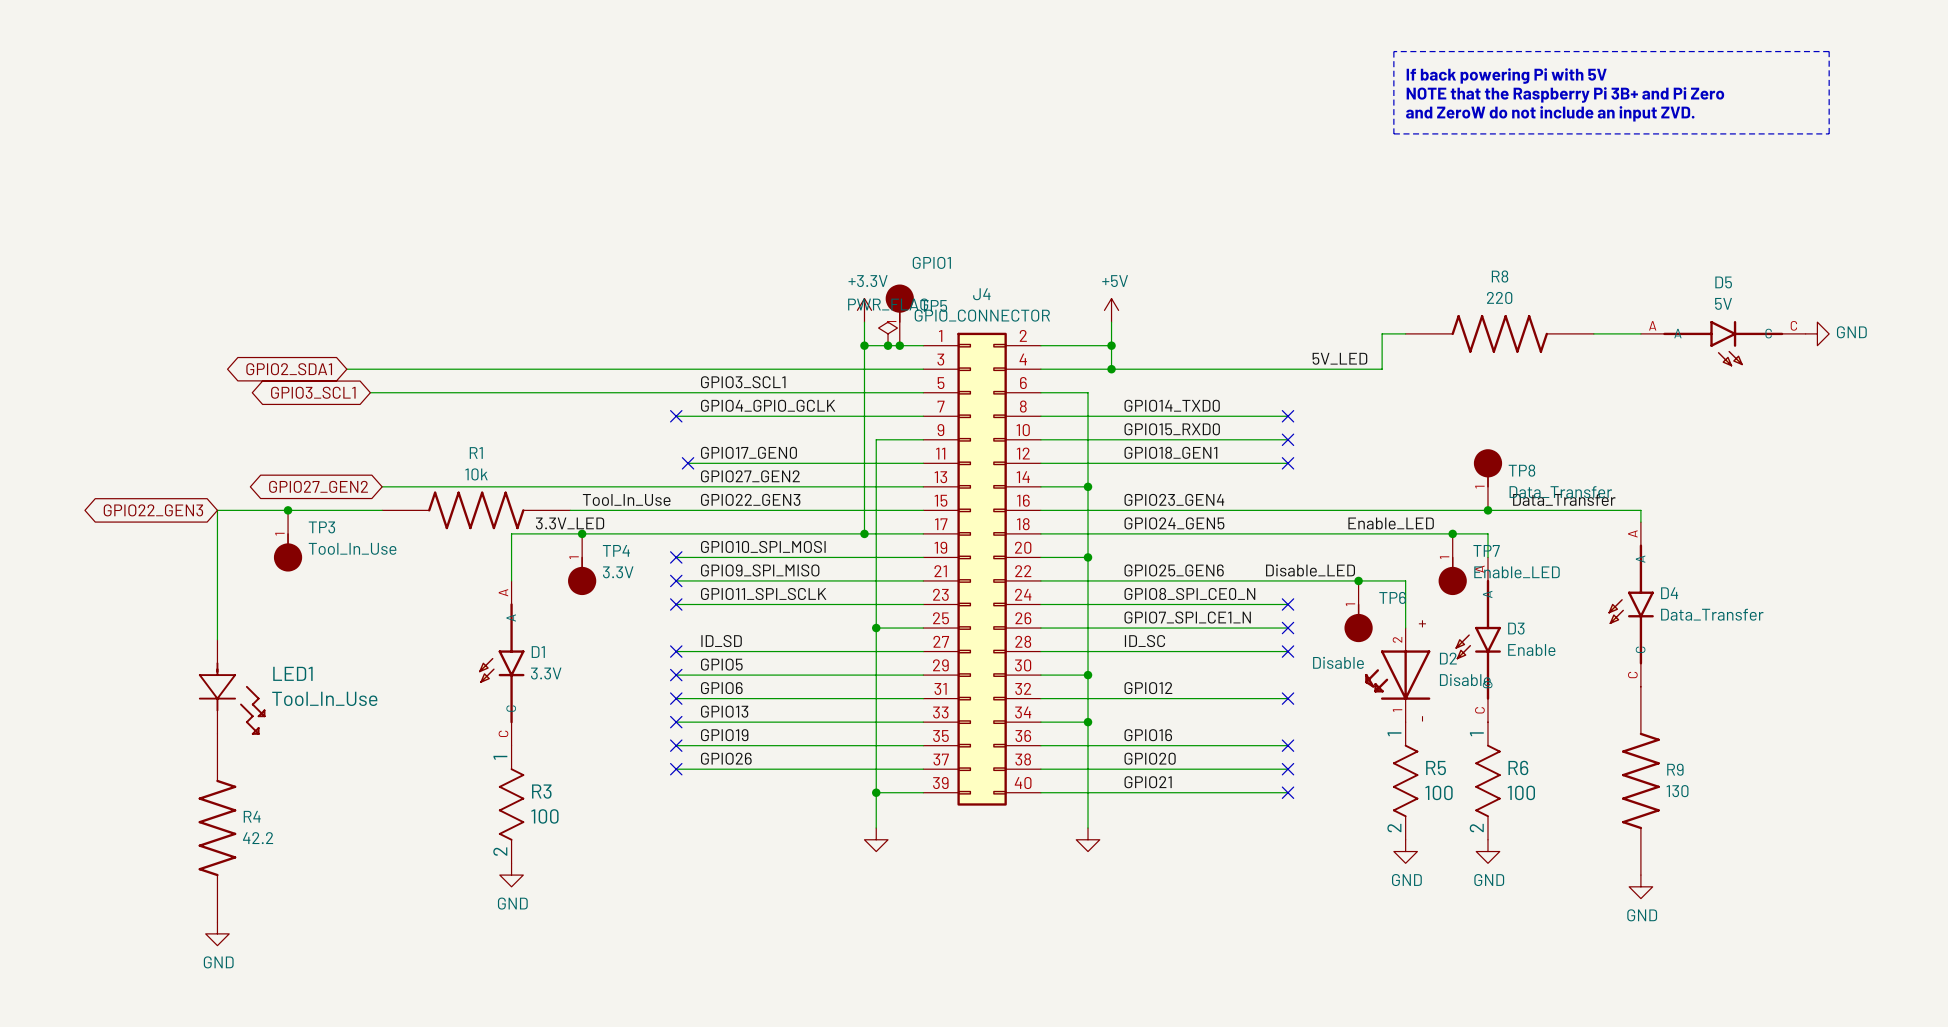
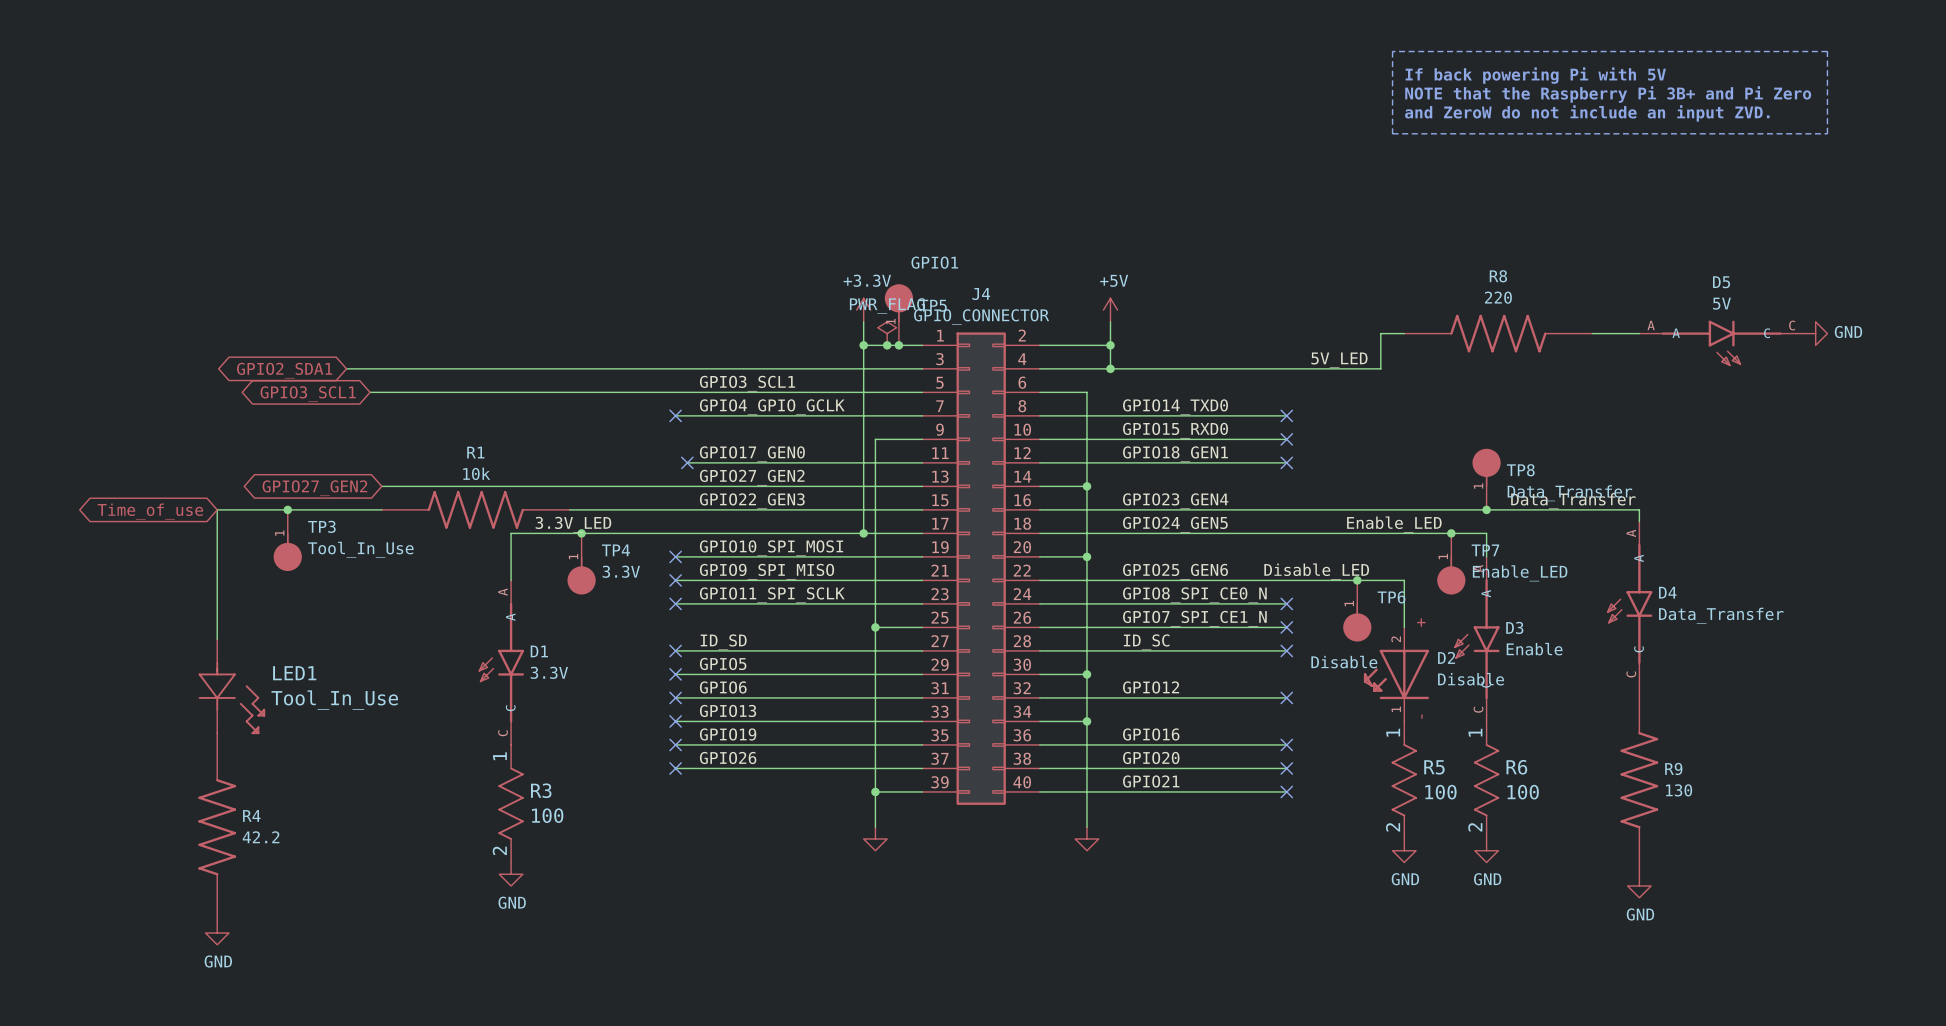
label: Tool_In_Use (626, 499) -> none
global label: GPIO22_GEN3 (153, 510) -> Time_of_use (150, 511)

